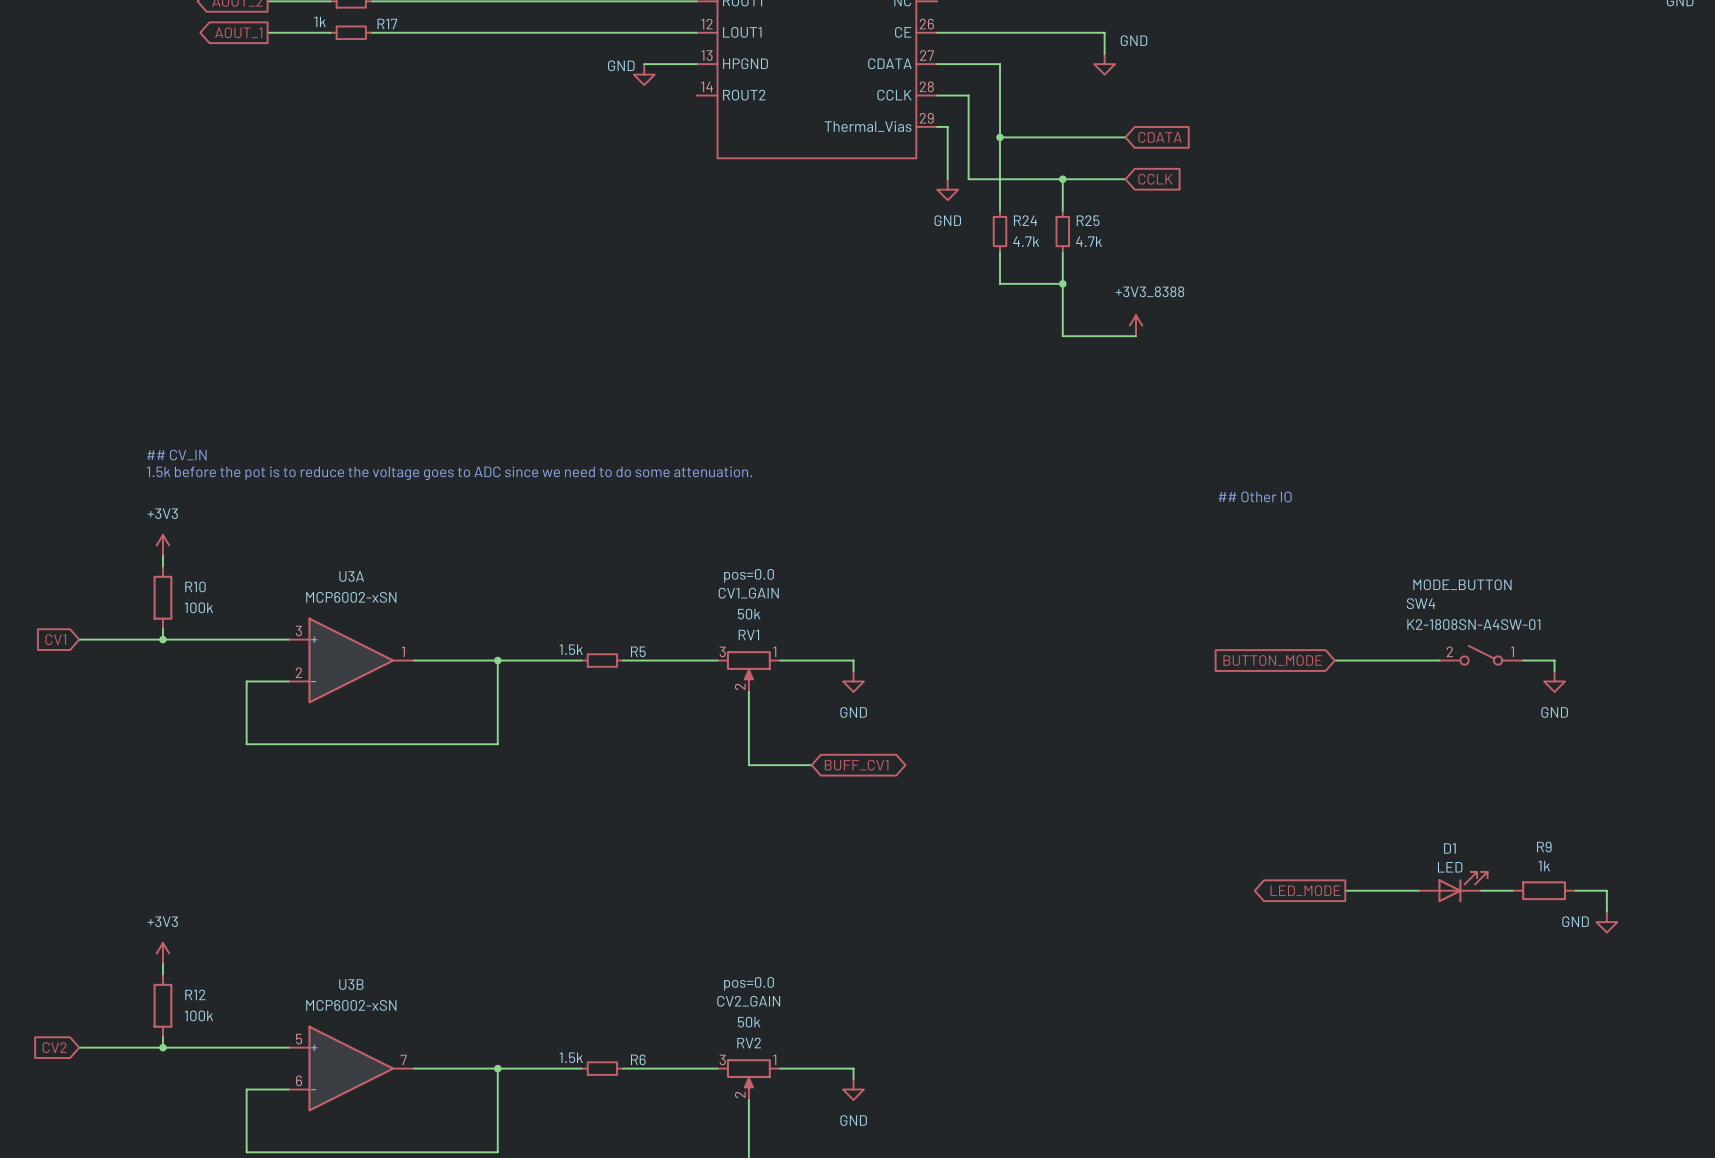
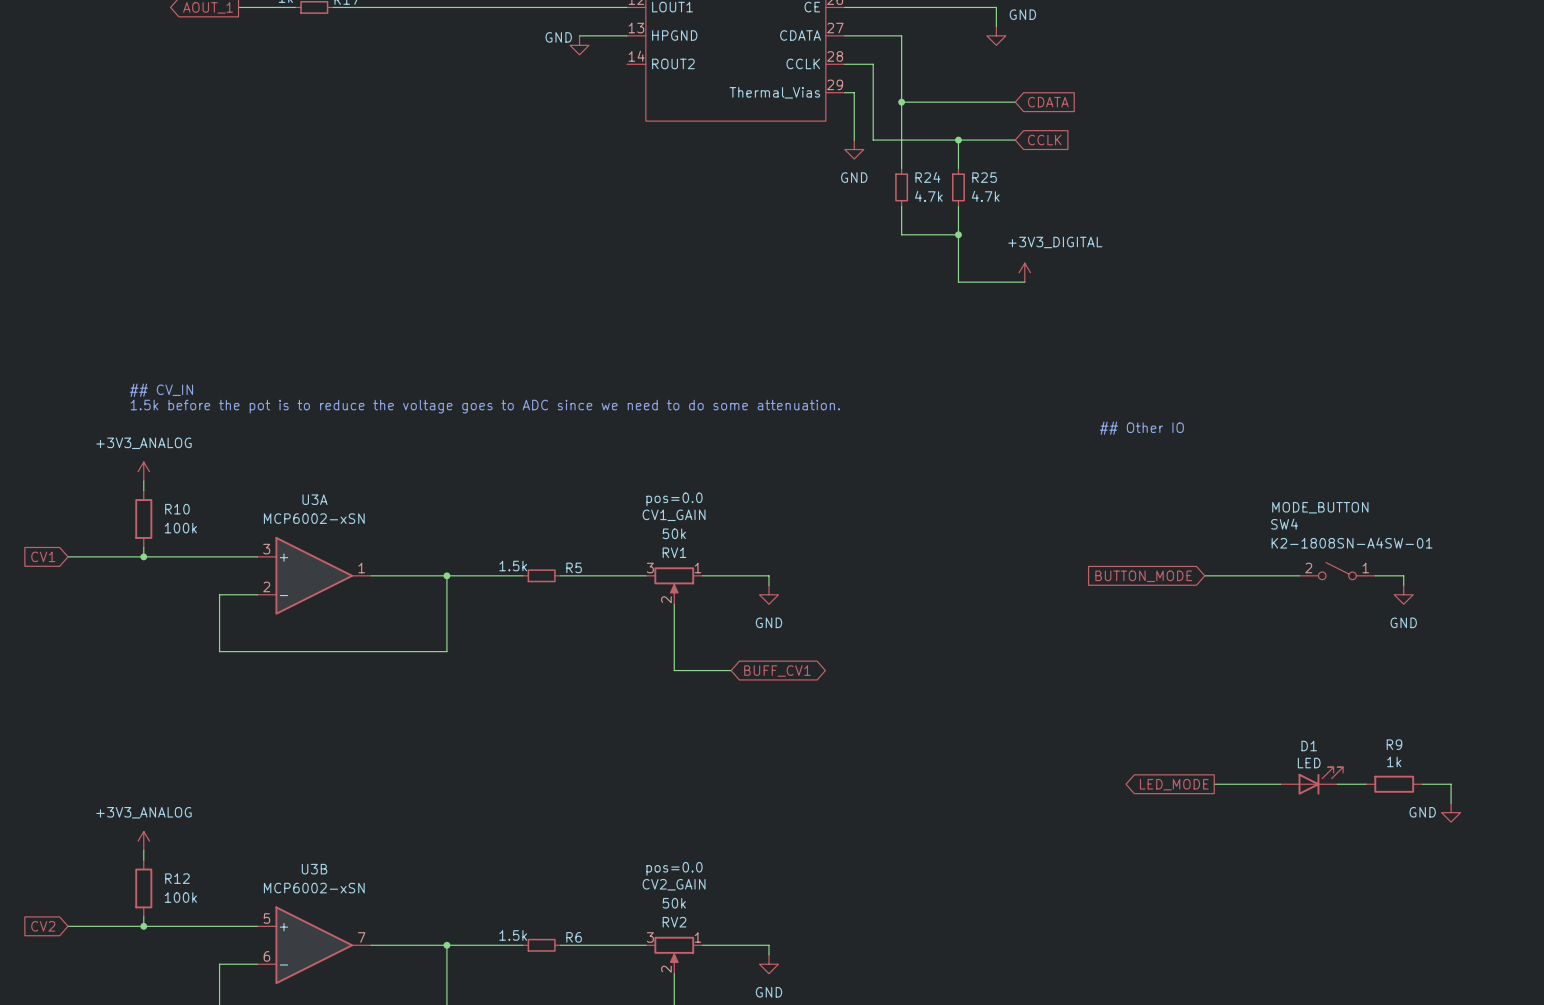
power symbol: +3V3_8388 (1136, 325) -> +3V3_DIGITAL (1024, 272)
power symbol: +3V3 (162, 545) -> +3V3_ANALOG (143, 471)
power symbol: +3V3 (162, 953) -> +3V3_ANALOG (143, 841)

